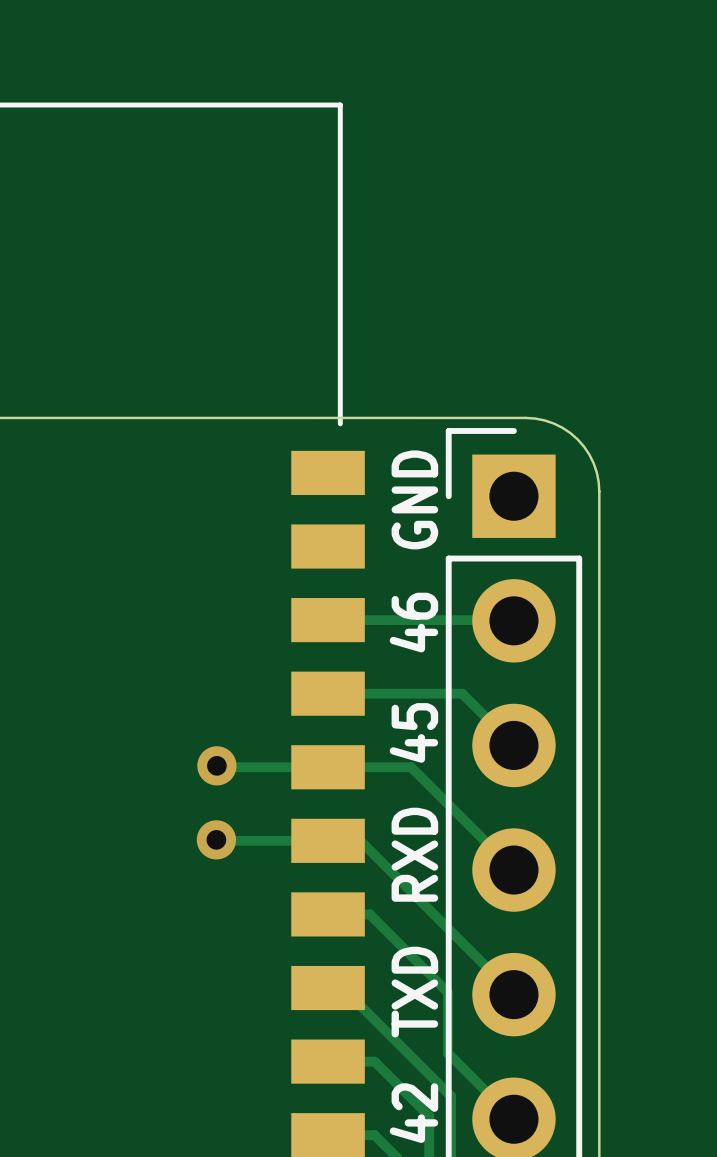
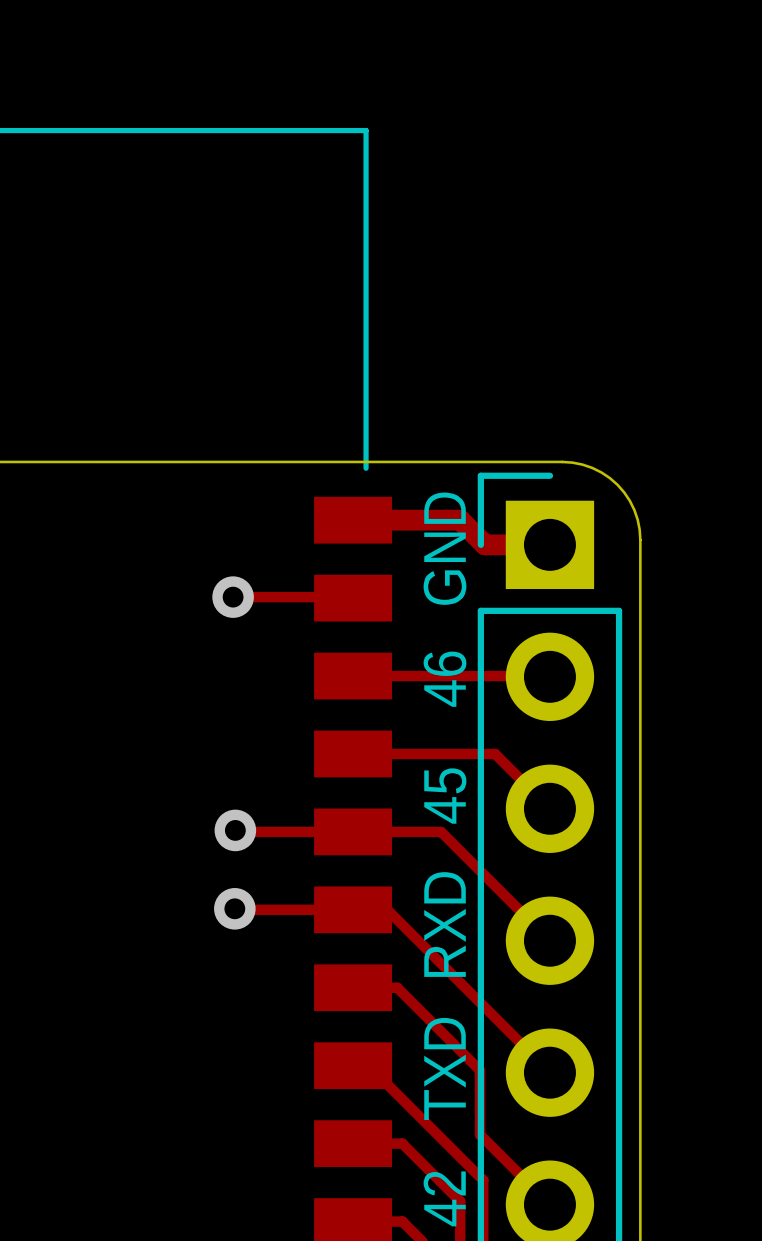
track: none -> (353, 520) (460, 520) (485, 544) (549, 544)
track: none -> (233, 597) (353, 598)
via: none -> (233, 597)

